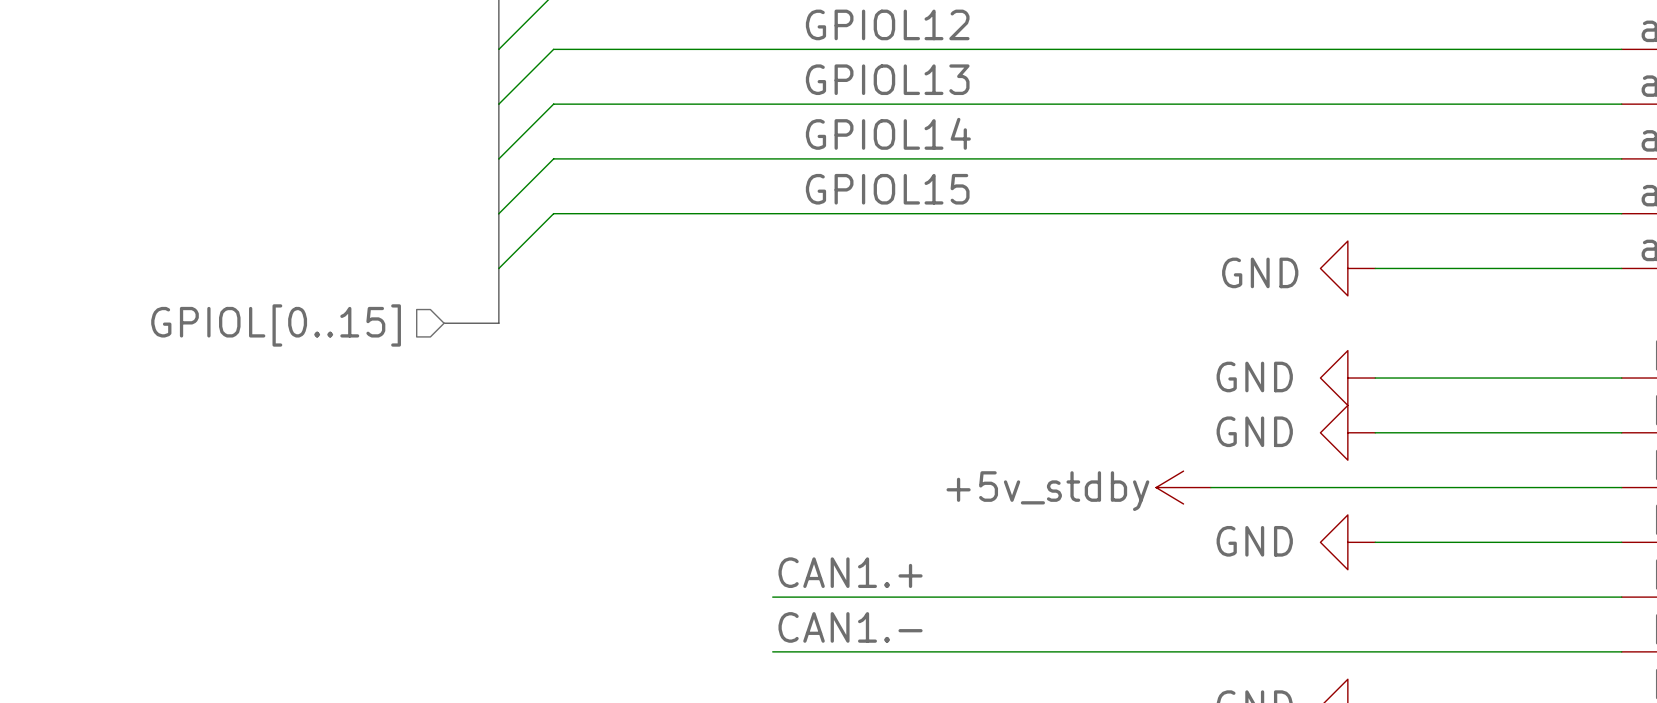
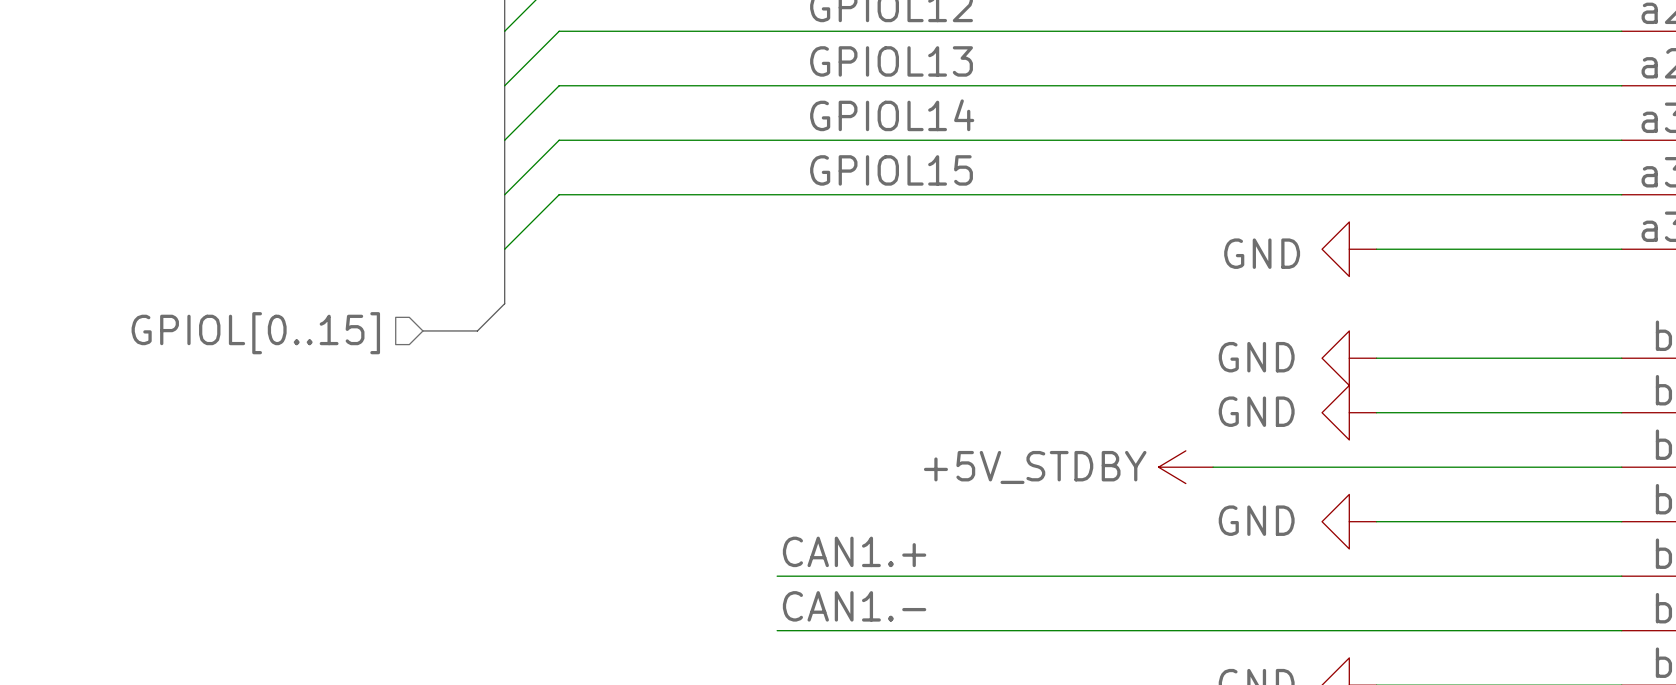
bus: (444, 323) (498, 323) -> (422, 330) (477, 330) (504, 303)
hierarchical label position: GPIOL[0..15] (276, 325) -> GPIOL[0..15] (255, 333)
power symbol: +5v_stdby (1183, 487) -> +5V_STDBY (1185, 467)

